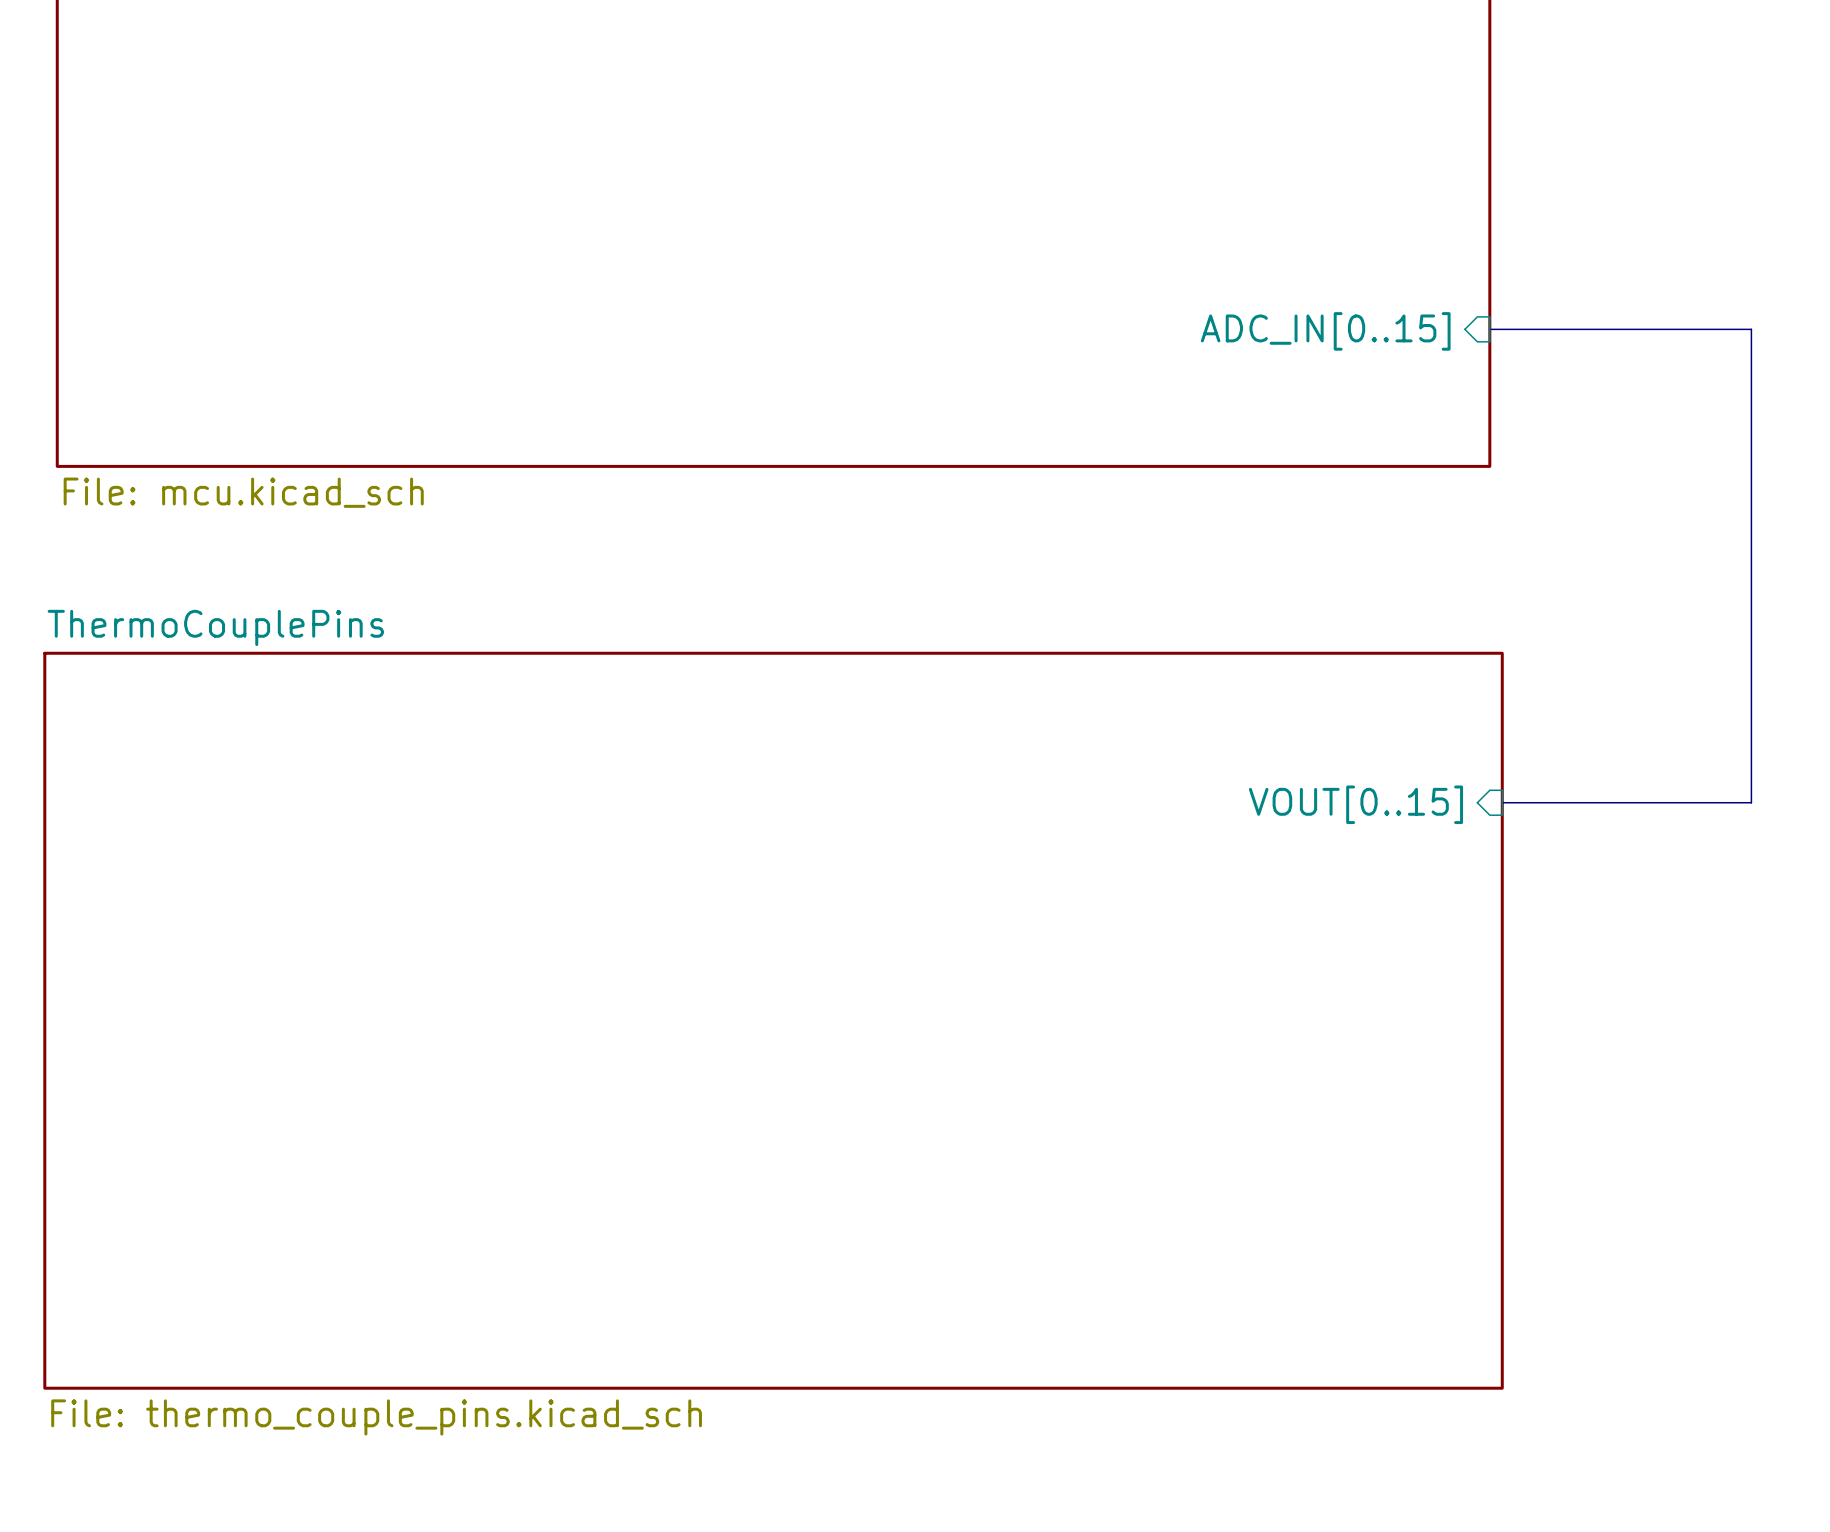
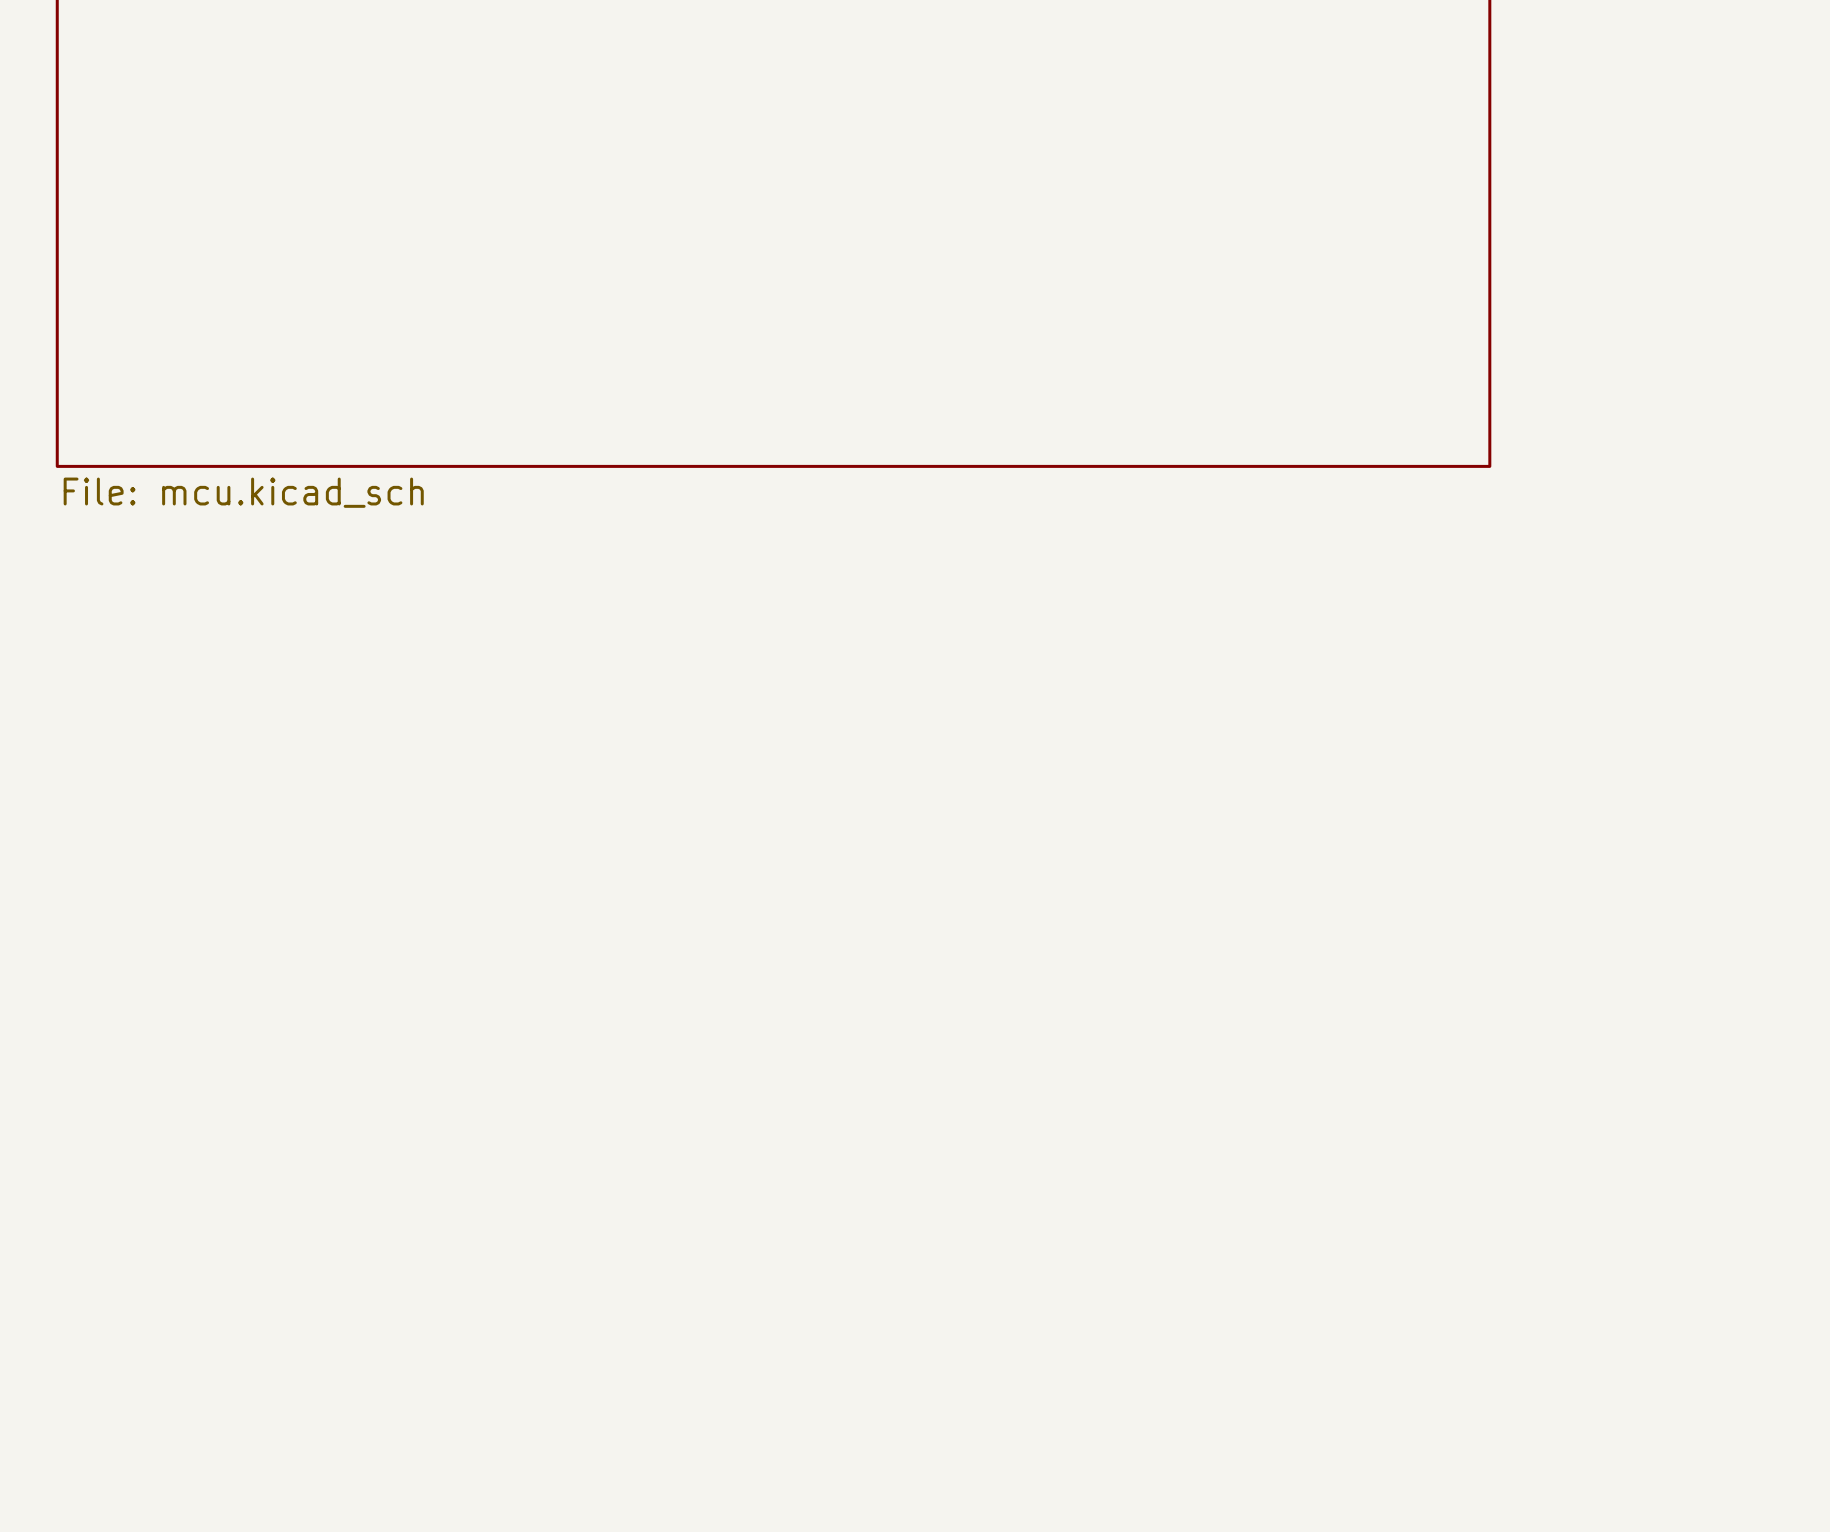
bus: (1489, 329) (1751, 329) (1751, 802) (1502, 802) -> none
sheet pin: ADC_IN[0..15] (1325, 331) -> none
sheet pin: VOUT[0..15] (1355, 804) -> none
sheet ThermoCouplePins: File: thermo_couple_pins.kicad_sch (773, 1020) -> none

